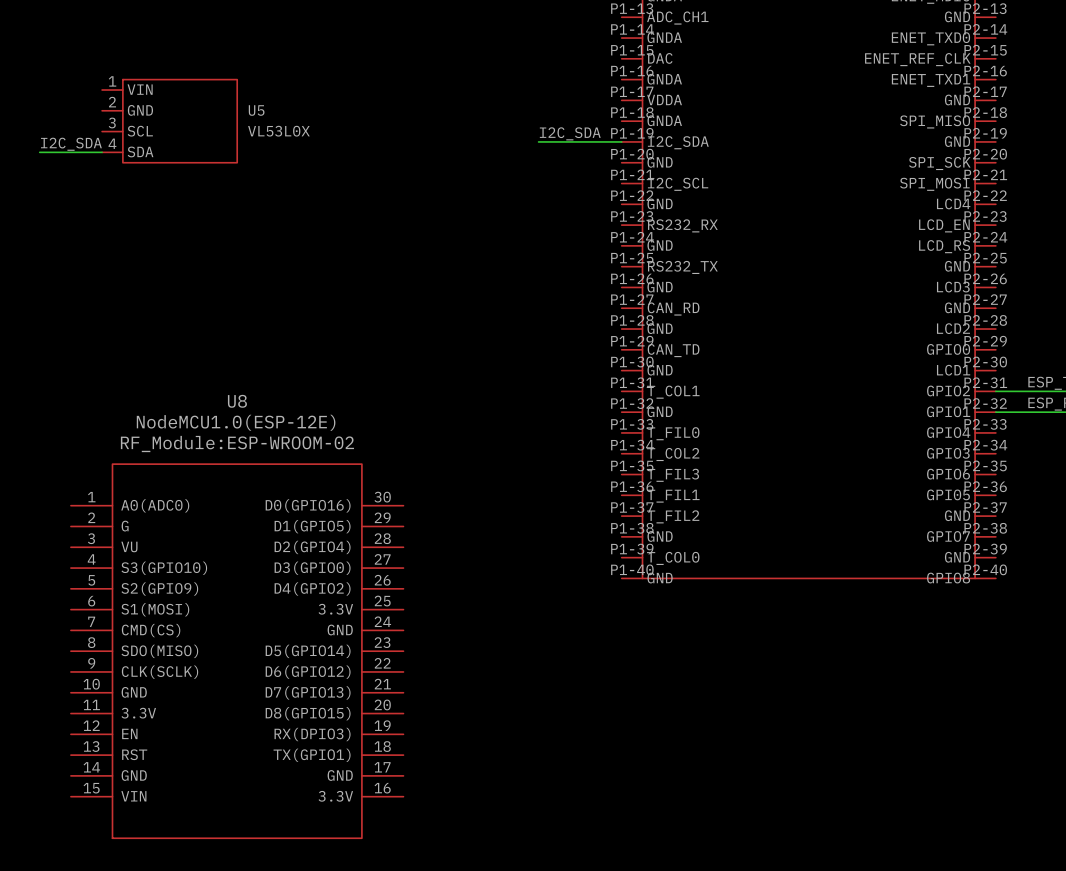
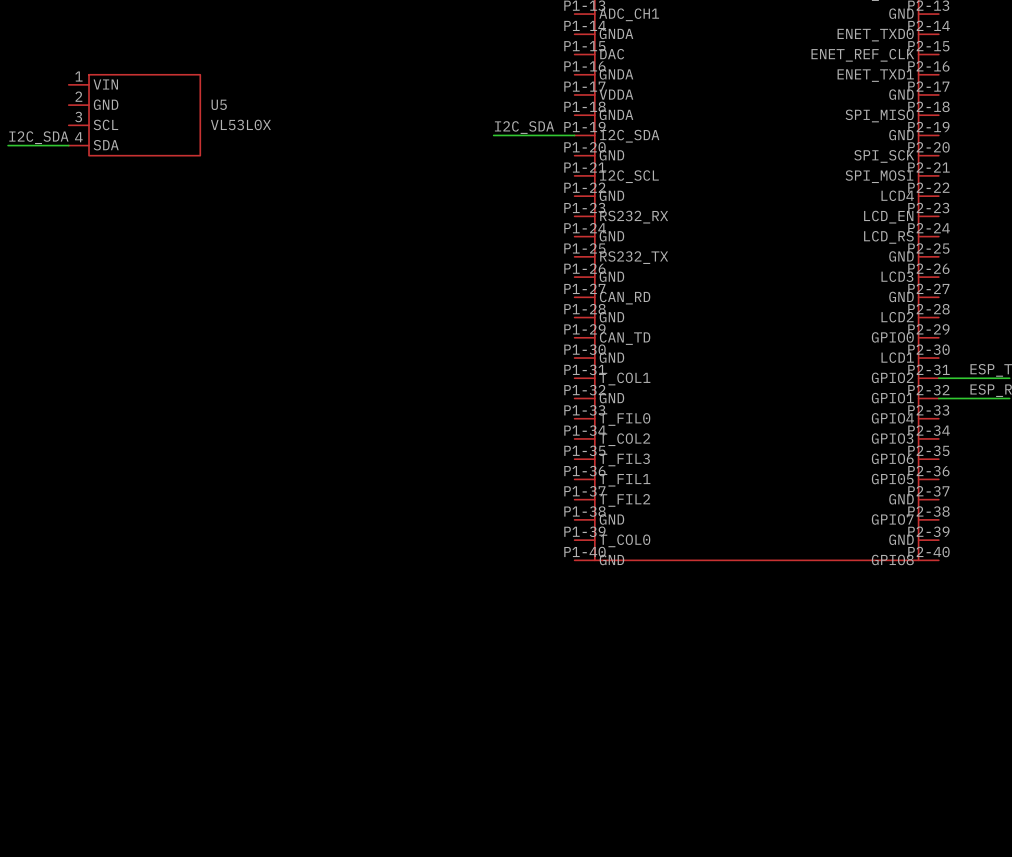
U8: NodeMCU1.0(ESP-12E) (237, 651) -> none

